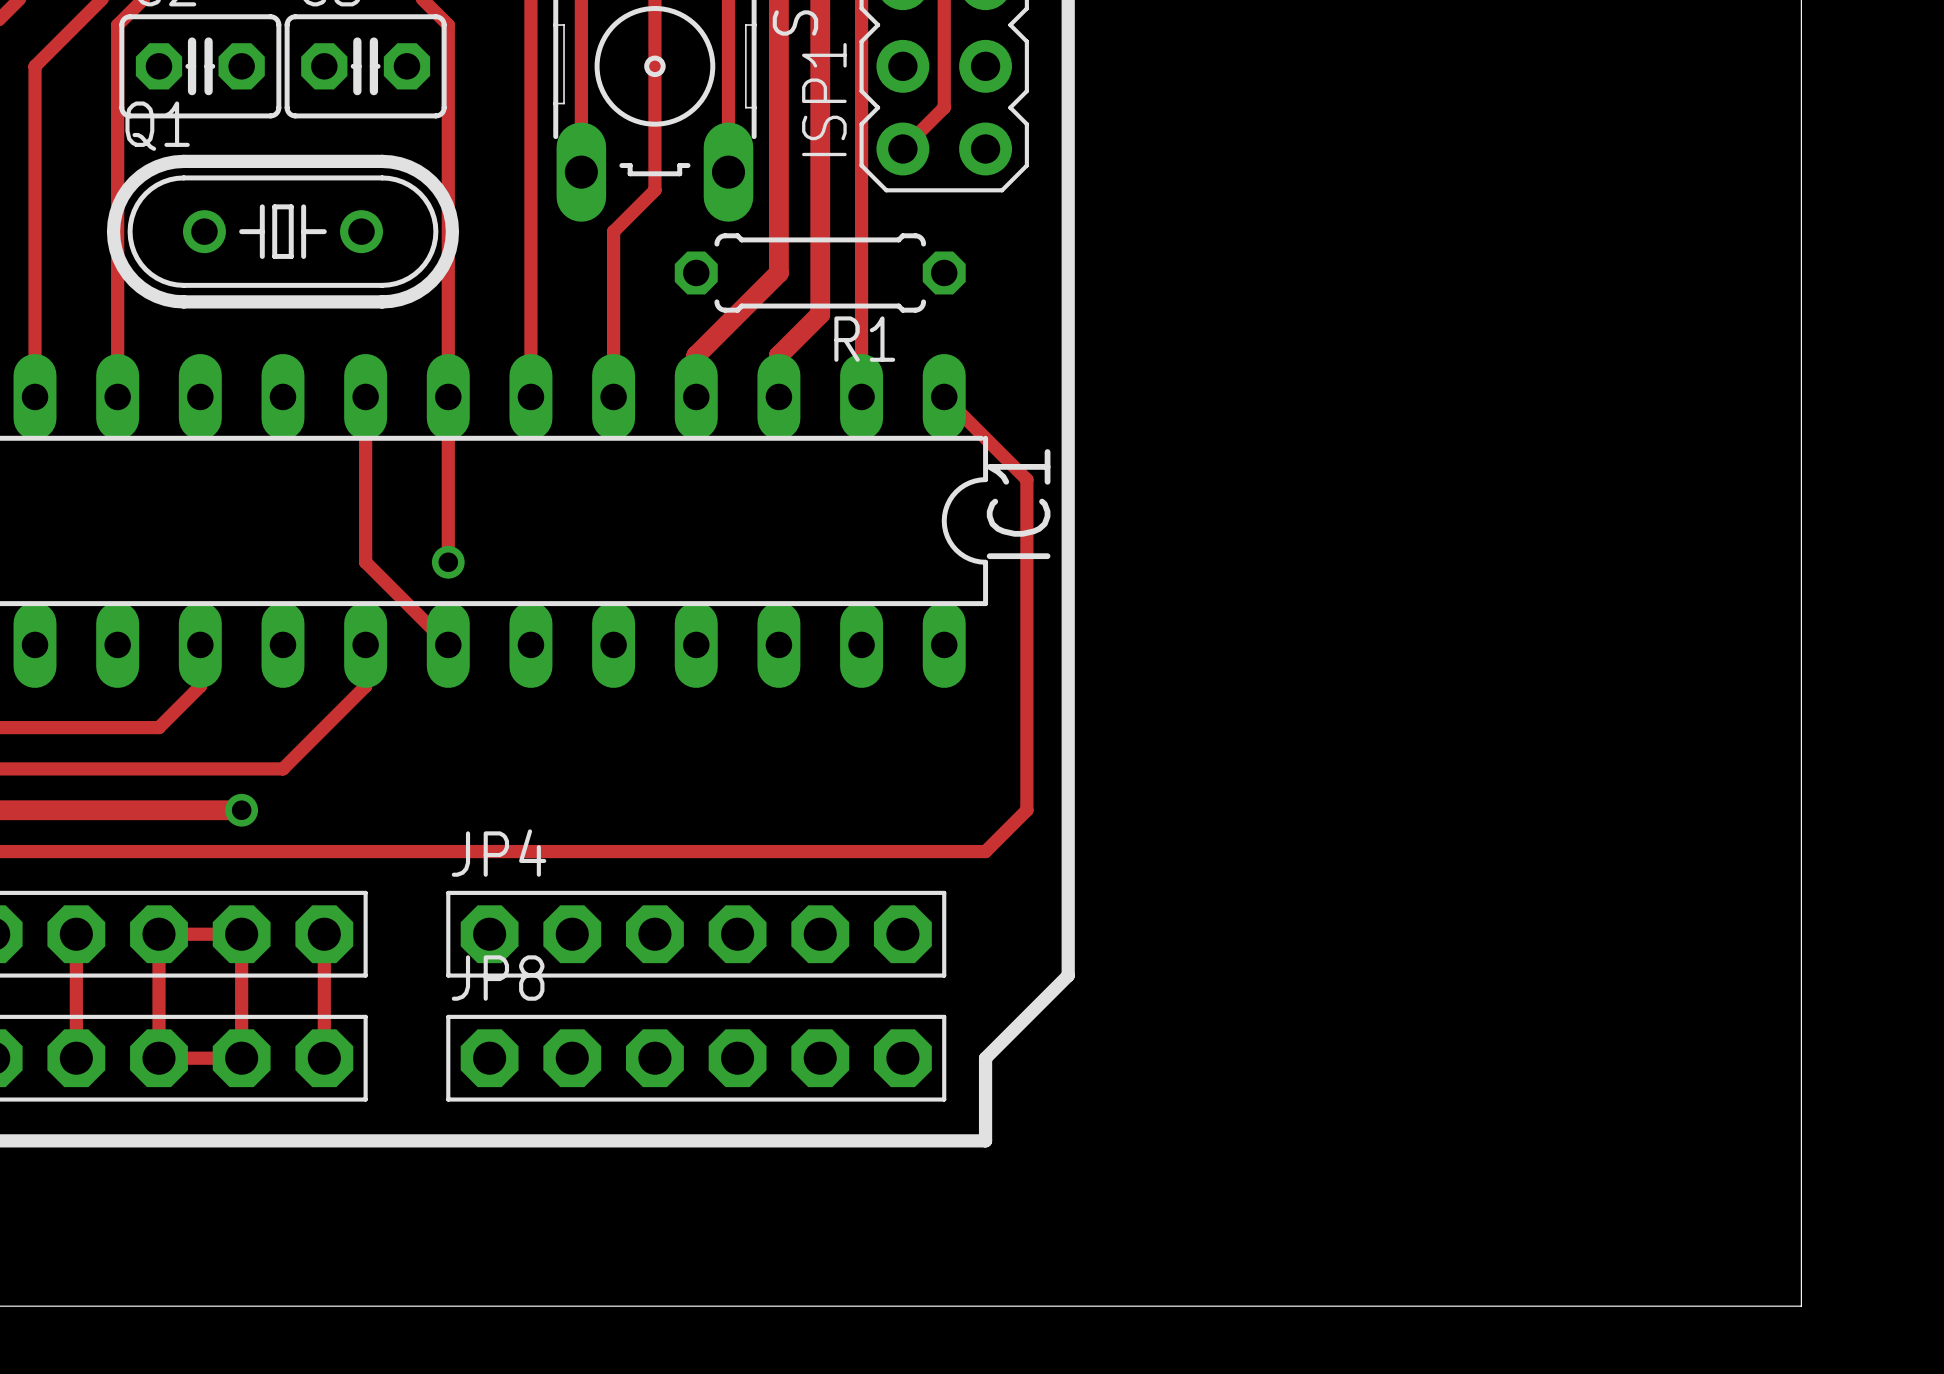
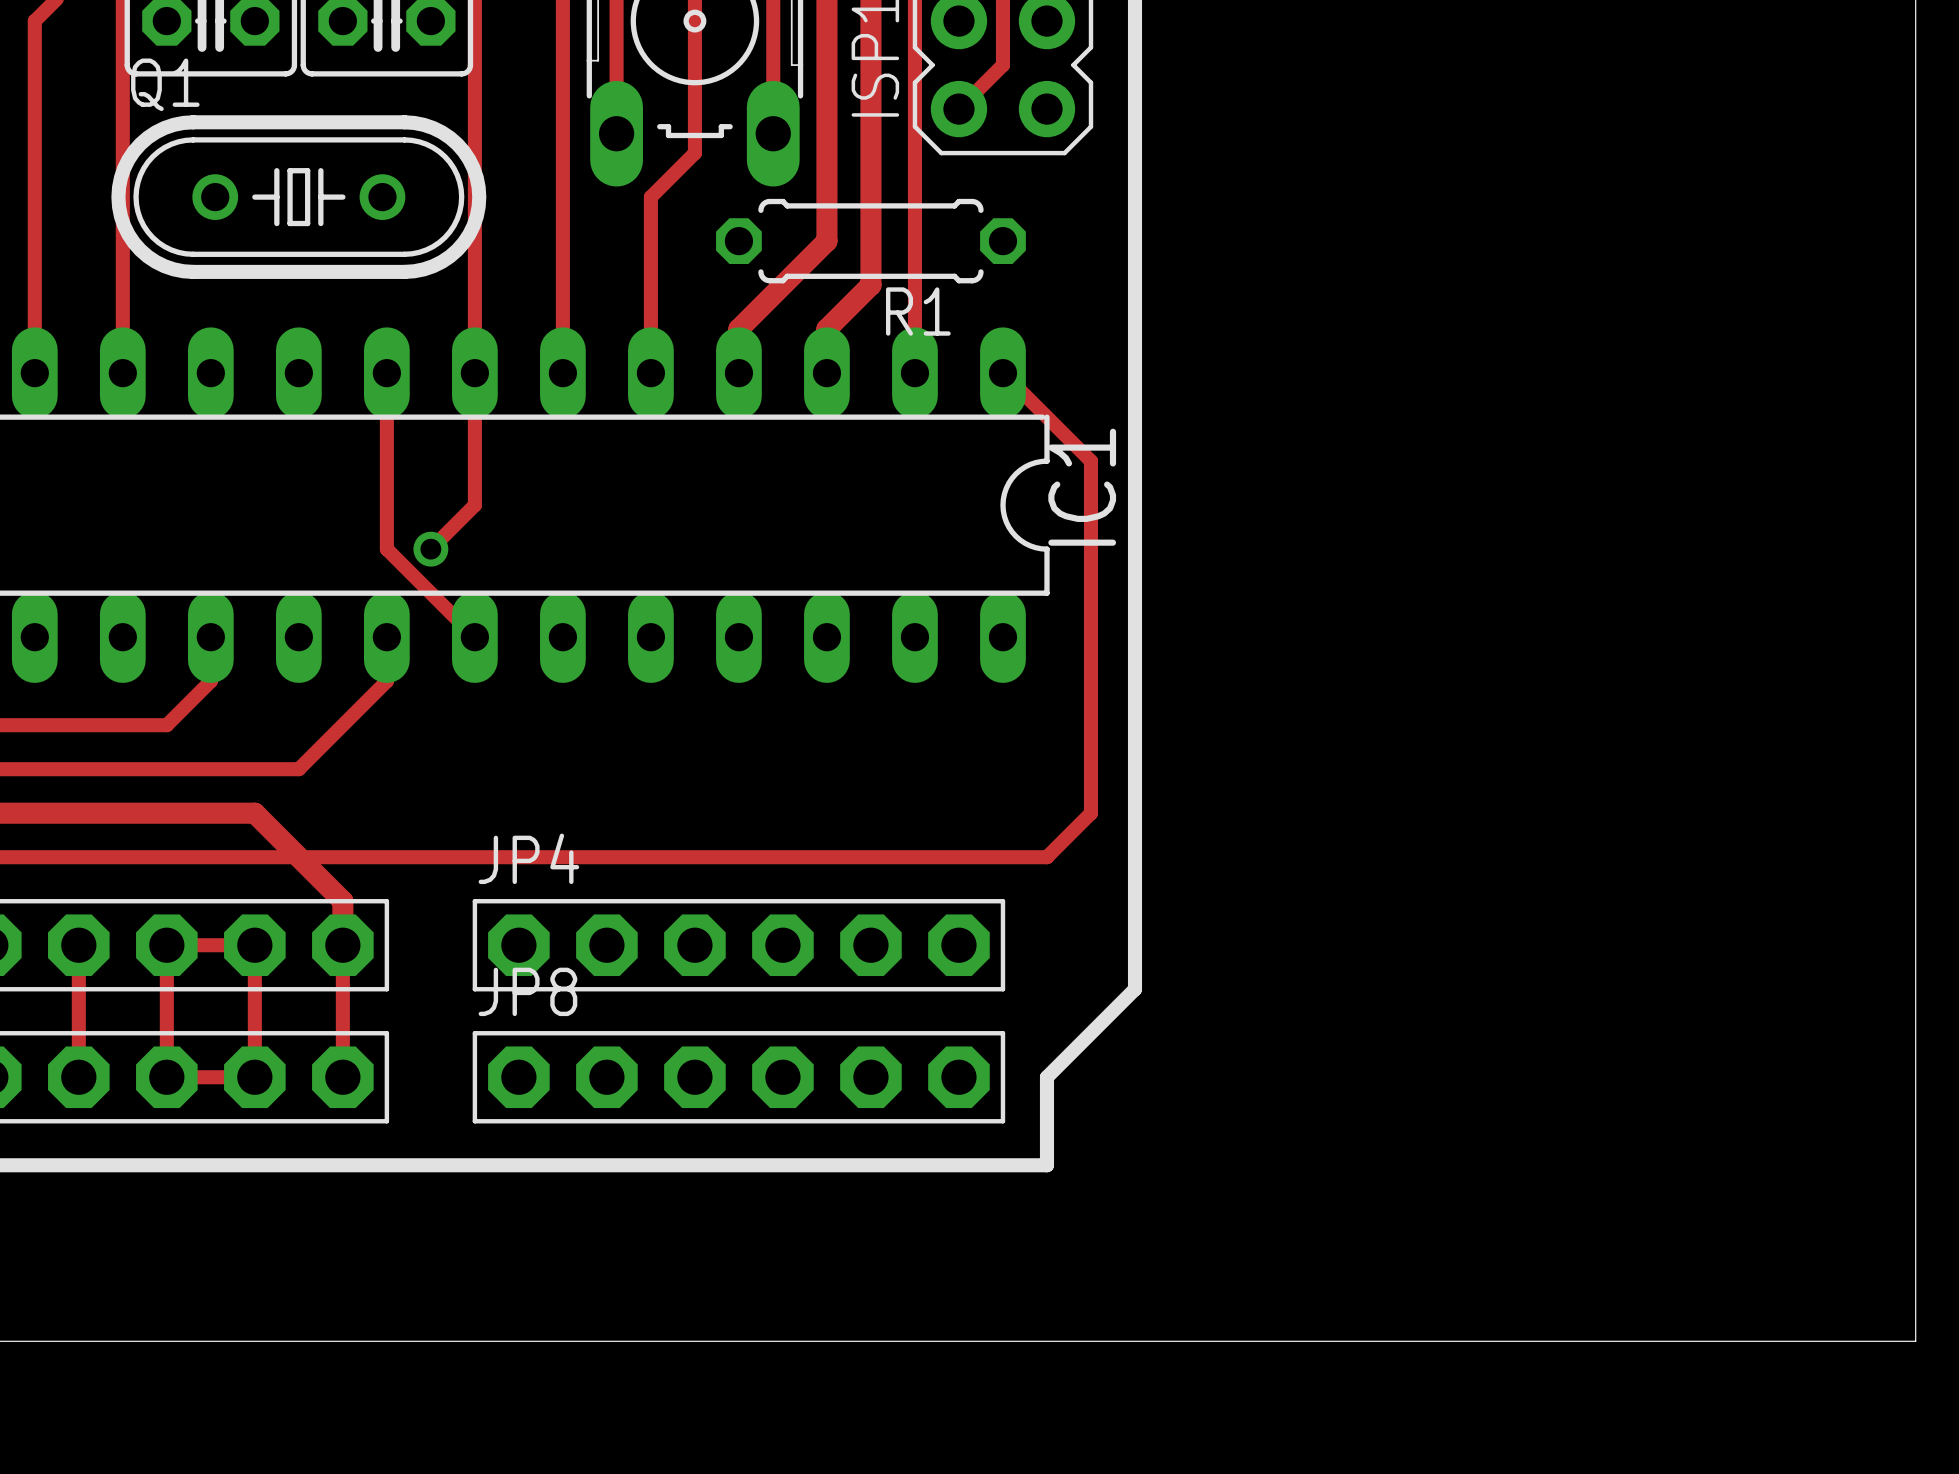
track: (448, 520) (448, 562) -> (474, 505) (430, 549)
via position: (448, 562) -> (430, 549)
track: none -> (254, 813) (342, 901) (342, 945)
via: (241, 810) -> none

